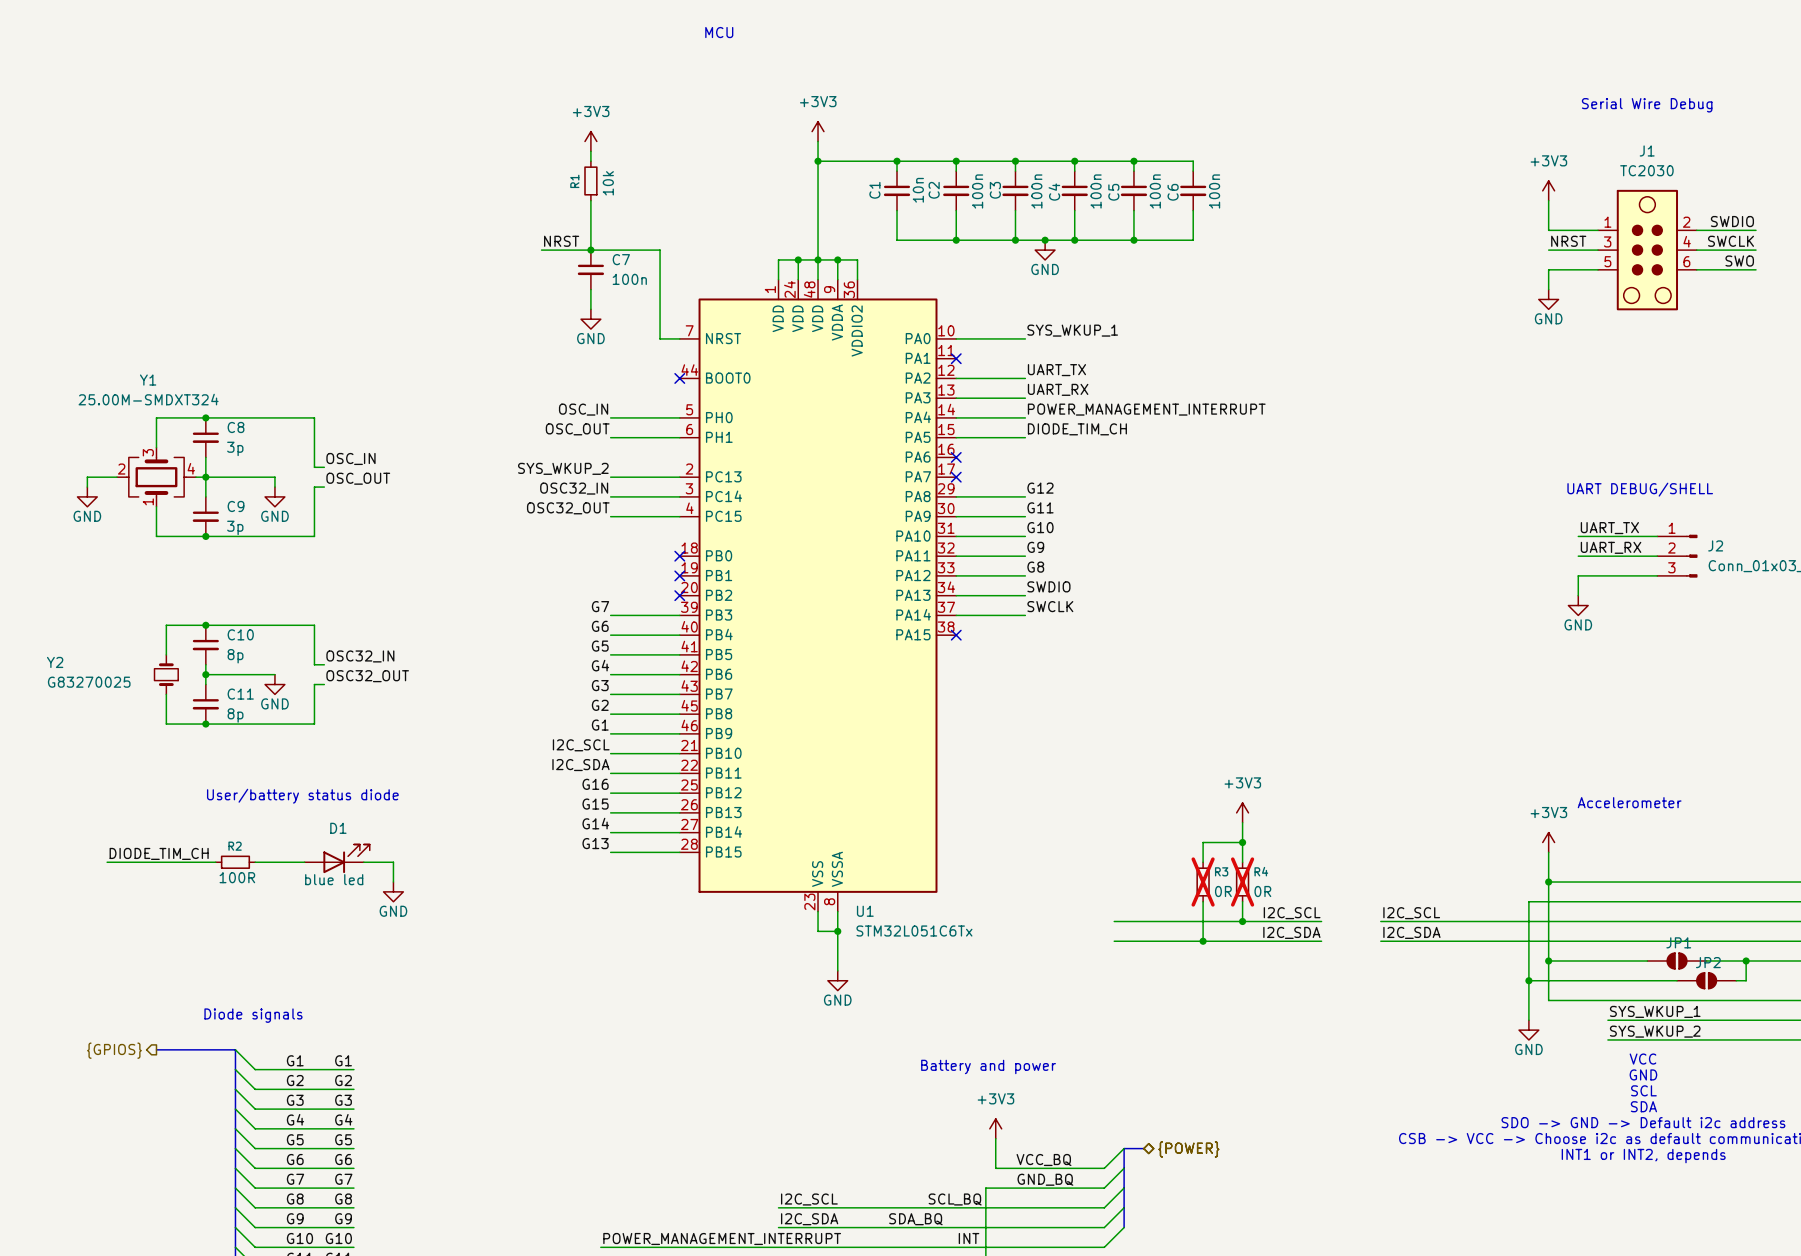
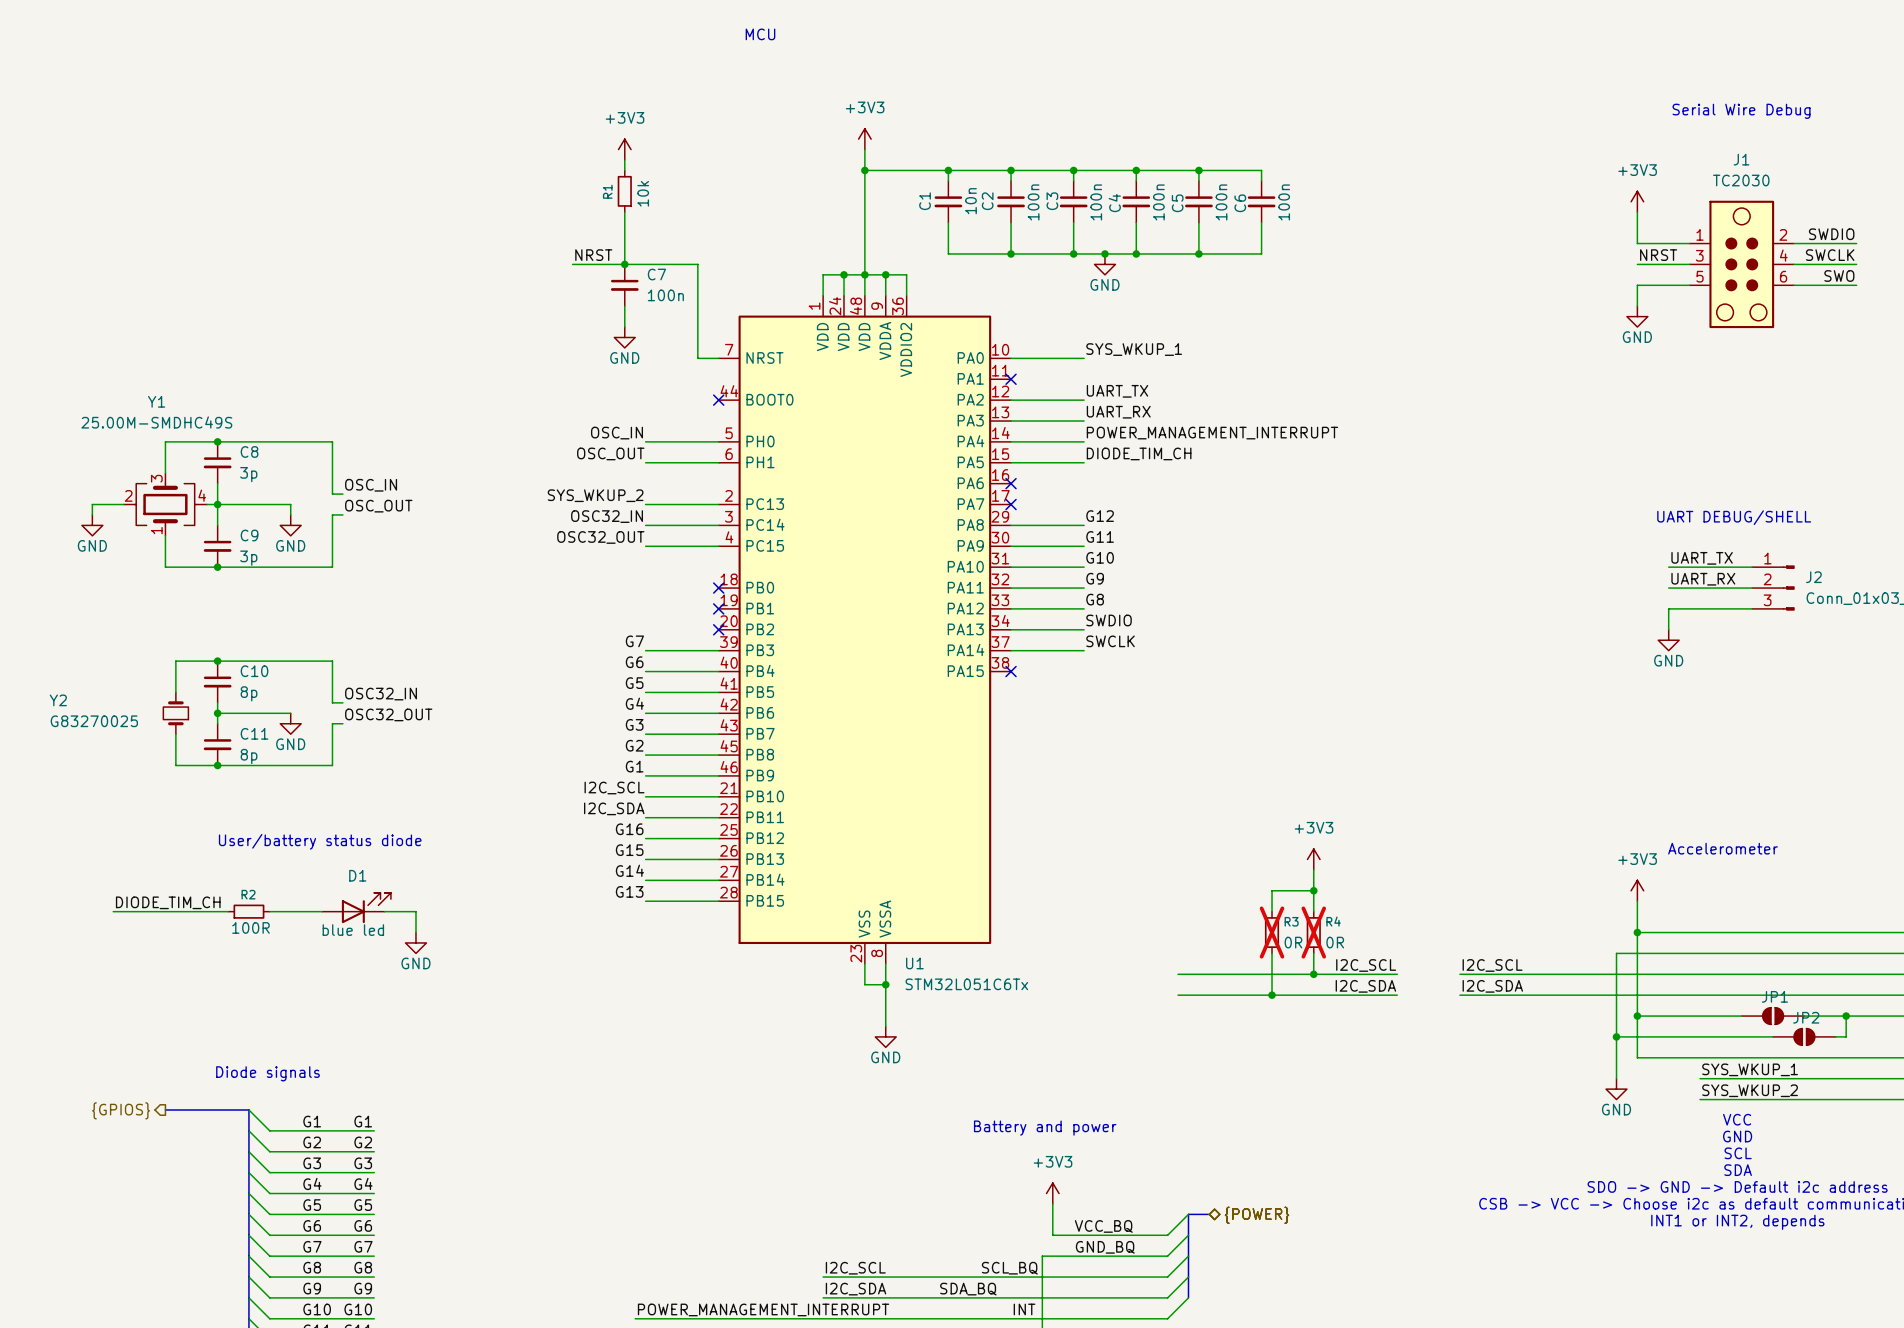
Y1 value: 25.00M-SMDXT324 (148, 399) -> 25.00M-SMDHC49S (156, 422)

